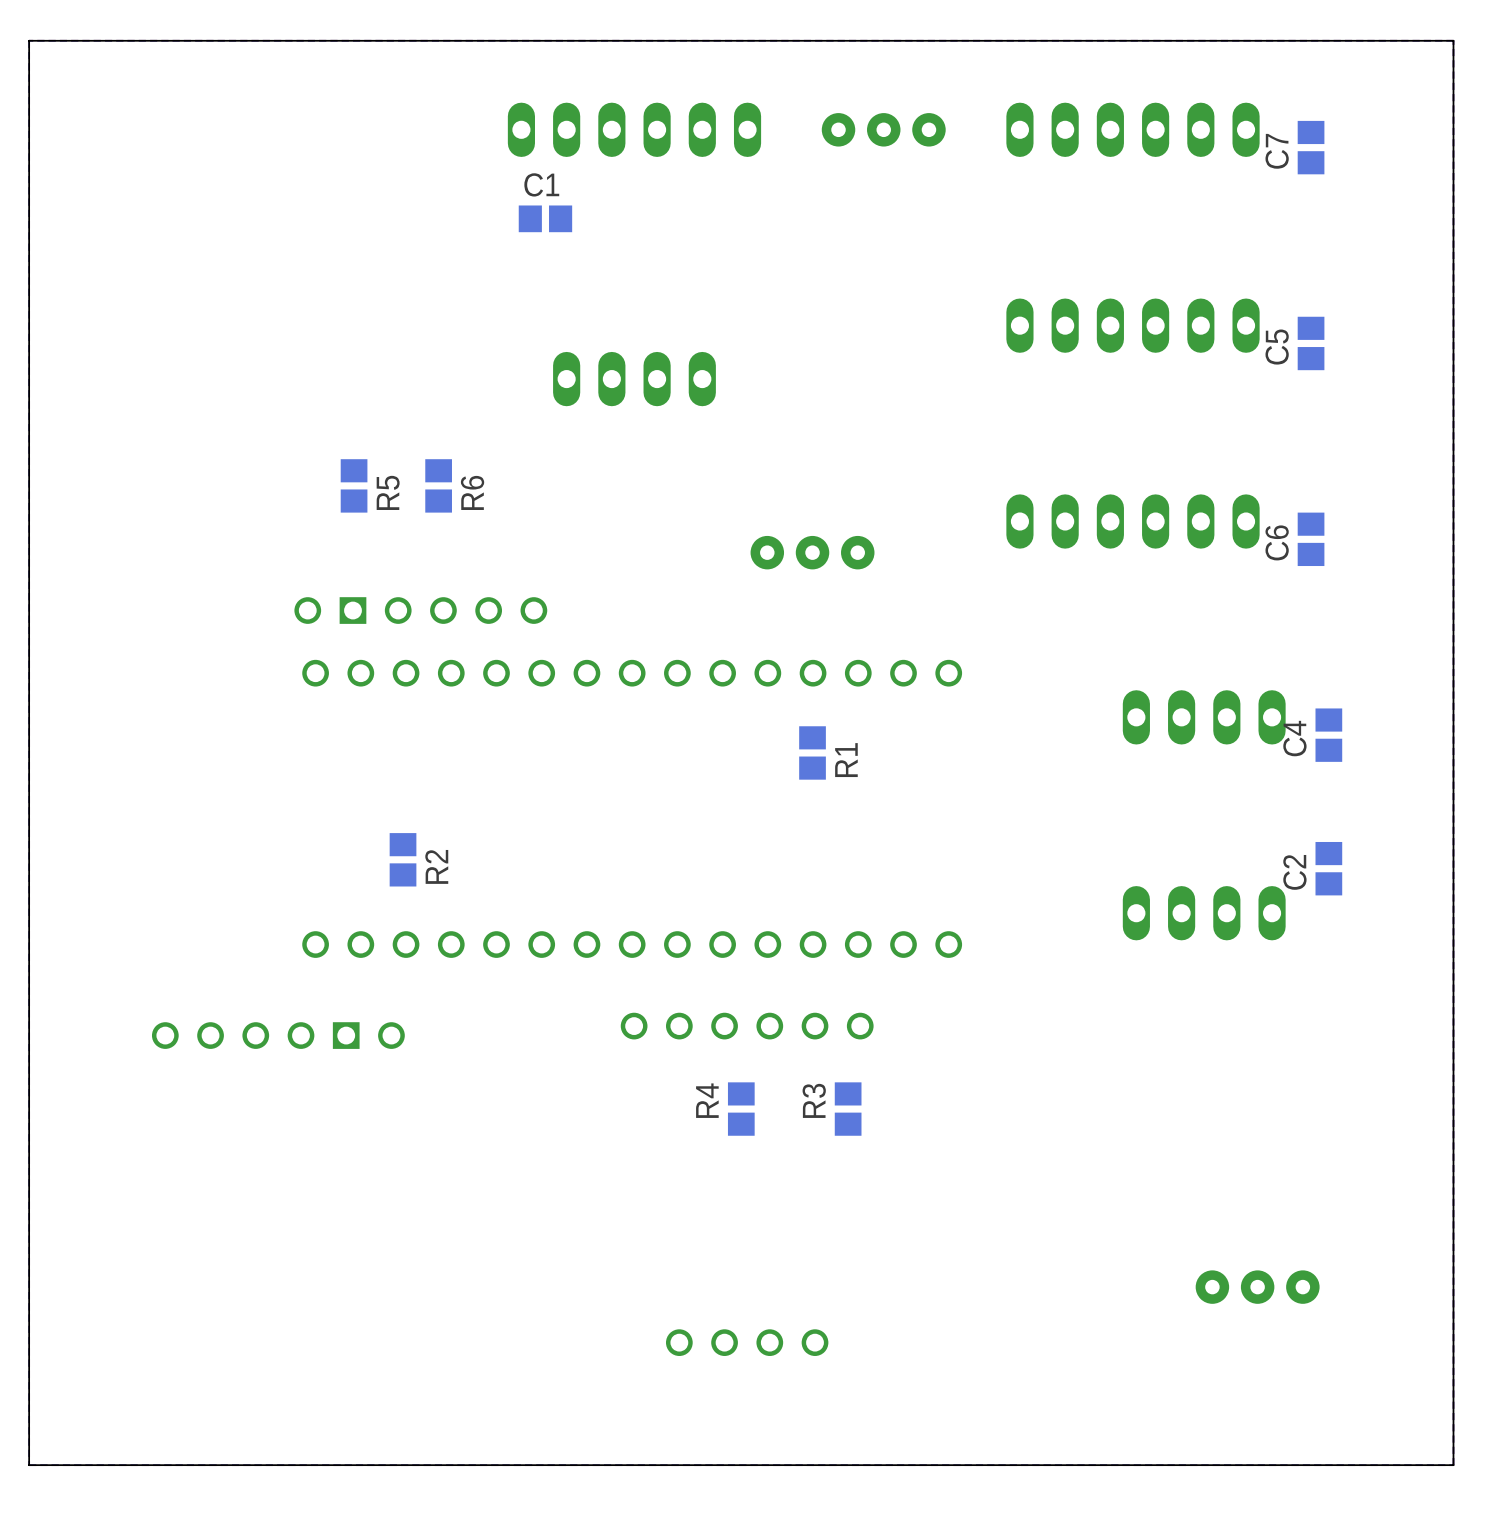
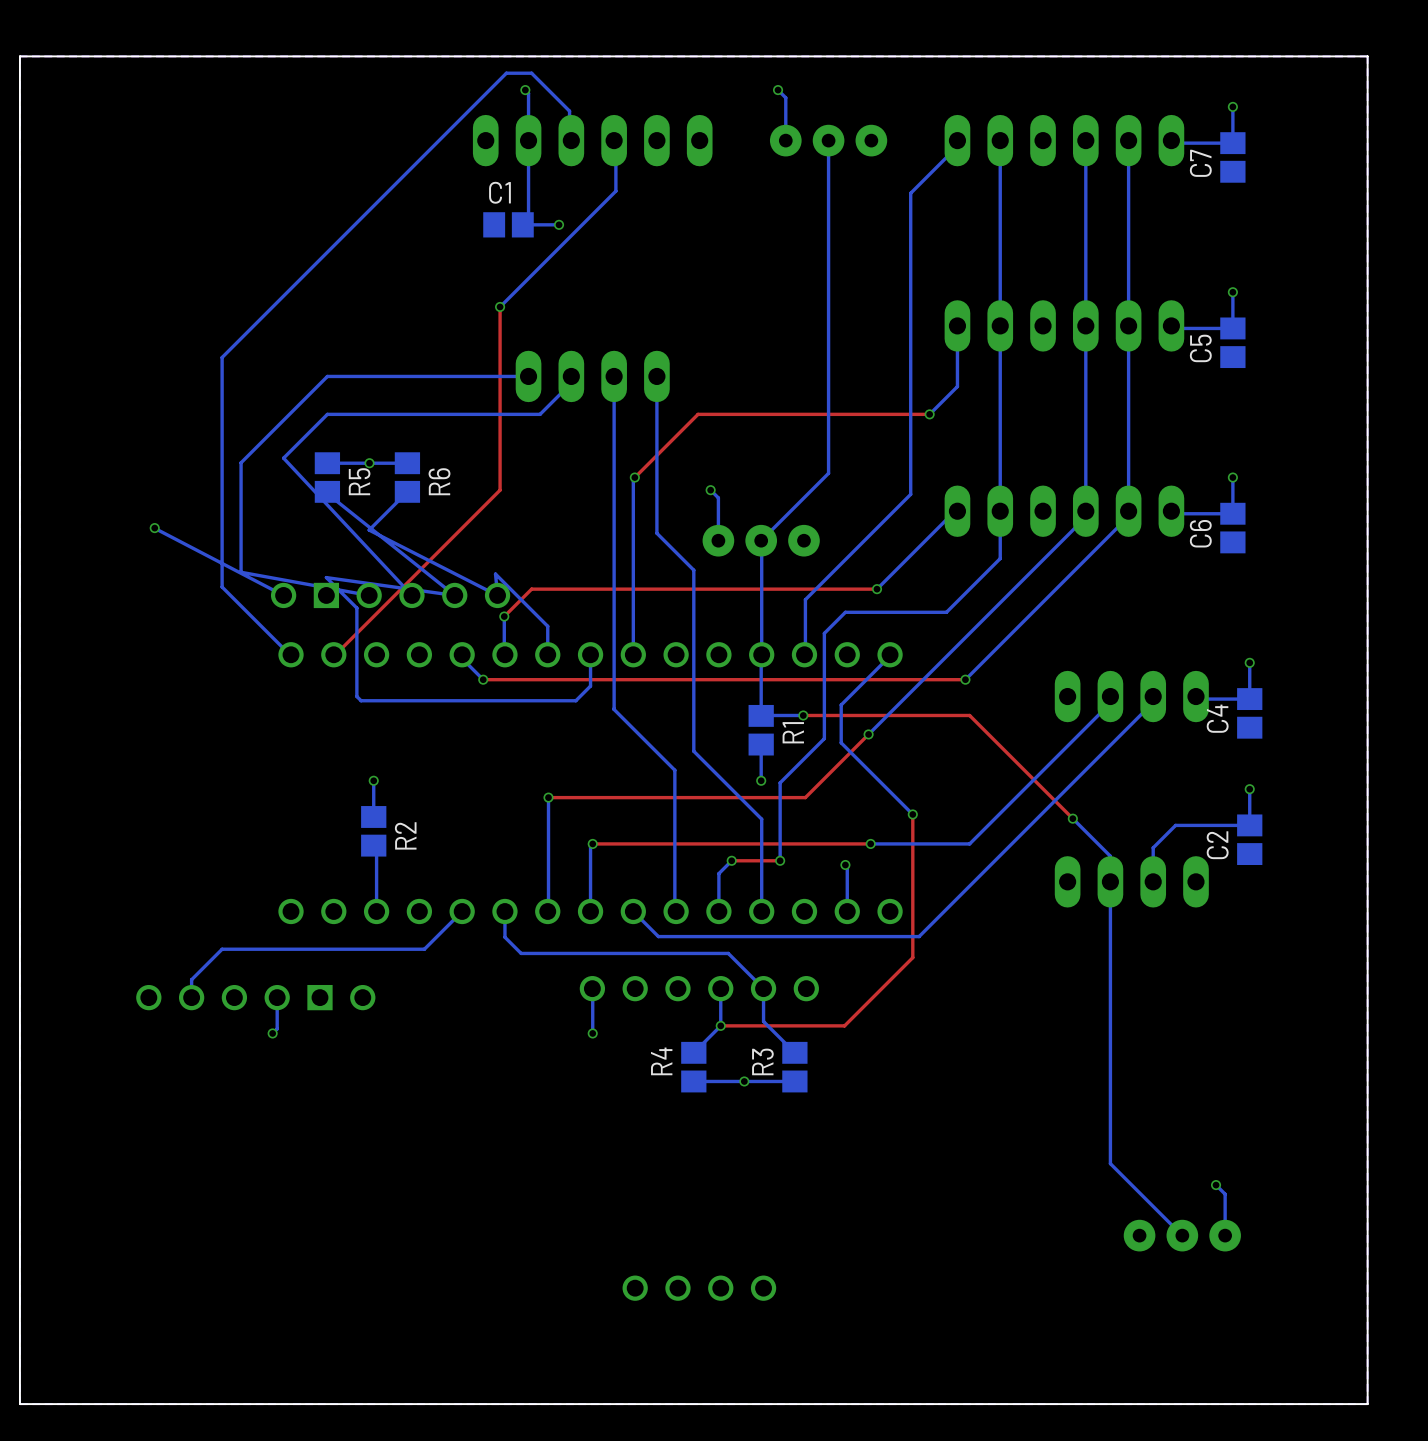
bottom track: none -> (525, 90) (528, 93) (528, 219) (522, 224) (559, 224)
via: none -> (525, 90)
bottom track: none -> (778, 90) (785, 97) (785, 140)
via: none -> (778, 90)
bottom track: none -> (1232, 106) (1232, 143) (1173, 143) (1171, 140)
via: none -> (1232, 106)
bottom track: none -> (571, 140) (569, 140) (569, 111) (531, 73) (506, 73) (222, 357) (222, 587) (291, 654)
bottom track: none -> (614, 140) (615, 140) (615, 191) (500, 306)
bottom track: none -> (828, 140) (828, 473) (761, 540)
bottom track: none -> (957, 140) (957, 146) (910, 193) (910, 494) (805, 599) (804, 654)
bottom track: none -> (1000, 140) (1000, 558) (946, 612) (845, 612) (824, 633) (824, 738) (780, 782) (780, 860)
bottom track: none -> (1085, 140) (1085, 511)
bottom track: none -> (1128, 140) (1127, 517) (965, 679)
via: none -> (559, 224)
bottom track: none -> (1232, 292) (1232, 328) (1173, 328) (1171, 325)
via: none -> (1232, 292)
top track: none -> (500, 306) (500, 490) (333, 654)
via: none -> (500, 306)
bottom track: none -> (957, 325) (957, 386) (929, 414)
bottom track: none -> (528, 376) (327, 376) (241, 462) (241, 572) (369, 595)
bottom track: none -> (571, 376) (569, 376) (569, 384) (540, 414) (327, 414) (283, 458) (411, 595)
bottom track: none -> (614, 376) (613, 709) (674, 770) (676, 911)
bottom track: none -> (656, 376) (656, 533) (693, 570) (693, 751) (761, 819) (761, 911)
top track: none -> (929, 414) (698, 414) (634, 477)
via: none -> (929, 414)
via: none -> (369, 463)
bottom track: none -> (407, 463) (327, 463)
bottom track: none -> (634, 477) (633, 479) (633, 654)
via: none -> (634, 477)
bottom track: none -> (1232, 477) (1232, 513) (1173, 513) (1171, 511)
via: none -> (1232, 477)
bottom track: none -> (710, 490) (718, 497) (718, 540)
via: none -> (710, 490)
bottom track: none -> (327, 491) (454, 595) (326, 577) (356, 608) (356, 696) (361, 700) (575, 700) (590, 686) (590, 654)
bottom track: none -> (407, 491) (369, 530) (497, 595) (495, 574) (547, 626) (547, 654)
bottom track: none -> (957, 511) (954, 511) (877, 589)
bottom track: none -> (1085, 511) (1085, 517) (868, 734)
bottom track: none -> (154, 528) (283, 595)
via: none -> (154, 528)
bottom track: none -> (761, 540) (761, 715)
top track: none -> (877, 589) (531, 589) (504, 616)
via: none -> (877, 589)
bottom track: none -> (504, 616) (504, 654)
via: none -> (504, 616)
bottom track: none -> (462, 654) (462, 658) (483, 679)
bottom track: none -> (890, 654) (841, 704) (841, 742) (912, 814)
bottom track: none -> (1249, 662) (1249, 699) (1198, 699) (1195, 696)
via: none -> (1249, 662)
via: none -> (483, 679)
top track: none -> (965, 679) (483, 679)
via: none -> (965, 679)
bottom track: none -> (1110, 696) (1108, 696) (1108, 704) (969, 843) (870, 843)
bottom track: none -> (1152, 696) (1152, 702) (919, 936) (658, 936) (633, 911)
bottom track: none -> (803, 715) (761, 715)
top track: none -> (803, 715) (969, 715) (1072, 818)
via: none -> (803, 715)
top track: none -> (868, 734) (805, 797) (548, 797)
via: none -> (868, 734)
bottom track: none -> (761, 744) (761, 780)
bottom track: none -> (373, 780) (373, 816)
via: none -> (373, 780)
via: none -> (761, 780)
bottom track: none -> (1249, 789) (1249, 825) (1175, 825) (1153, 847) (1153, 881)
via: none -> (1249, 789)
bottom track: none -> (548, 797) (547, 911)
via: none -> (548, 797)
top track: none -> (912, 814) (912, 957) (844, 1025) (720, 1025)
via: none -> (912, 814)
bottom track: none -> (1072, 818) (1110, 856) (1110, 1163) (1182, 1235)
via: none -> (1072, 818)
bottom track: none -> (592, 843) (590, 846) (590, 911)
via: none -> (592, 843)
top track: none -> (870, 843) (592, 843)
via: none -> (870, 843)
bottom track: none -> (373, 845) (376, 848) (376, 911)
bottom track: none -> (731, 860) (718, 873) (718, 911)
via: none -> (731, 860)
top track: none -> (780, 860) (731, 860)
via: none -> (780, 860)
bottom track: none -> (845, 864) (847, 866) (847, 911)
via: none -> (845, 864)
bottom track: none -> (462, 911) (424, 949) (222, 949) (191, 979) (191, 997)
bottom track: none -> (504, 911) (504, 937) (521, 953) (728, 953) (763, 988) (763, 1021) (794, 1052)
bottom track: none -> (592, 988) (592, 1033)
bottom track: none -> (720, 988) (720, 1025) (693, 1052)
bottom track: none -> (277, 997) (277, 1028) (272, 1033)
via: none -> (720, 1025)
via: none -> (272, 1033)
via: none -> (592, 1033)
via: none -> (744, 1081)
bottom track: none -> (794, 1081) (693, 1081)
bottom track: none -> (1216, 1185) (1225, 1194) (1225, 1235)
via: none -> (1216, 1185)

